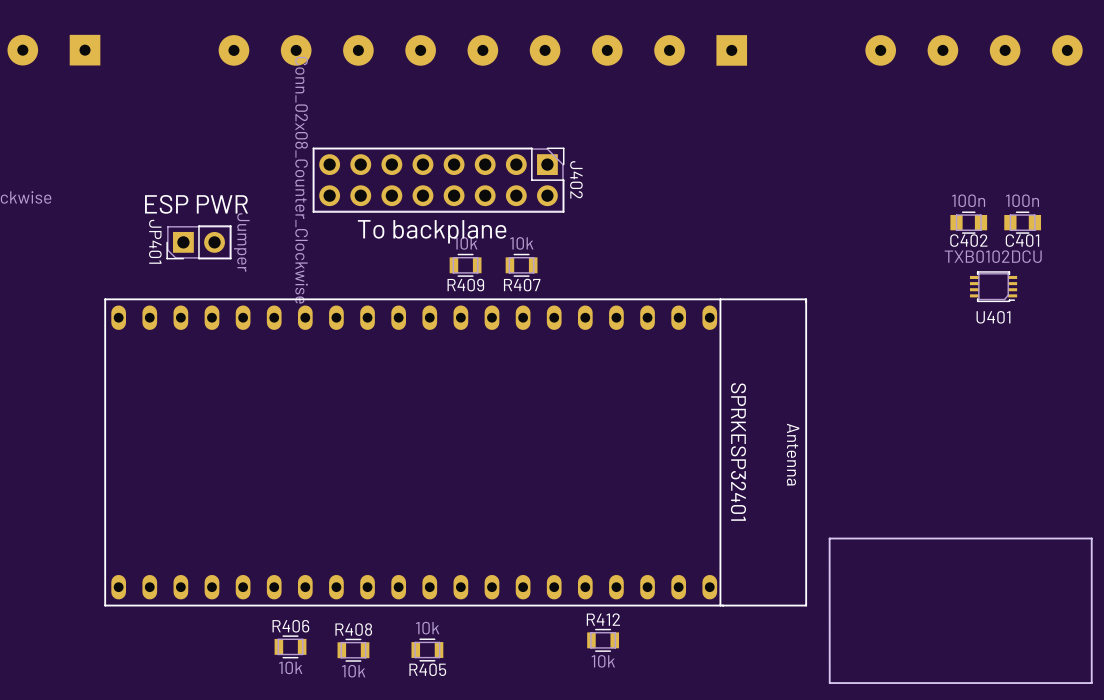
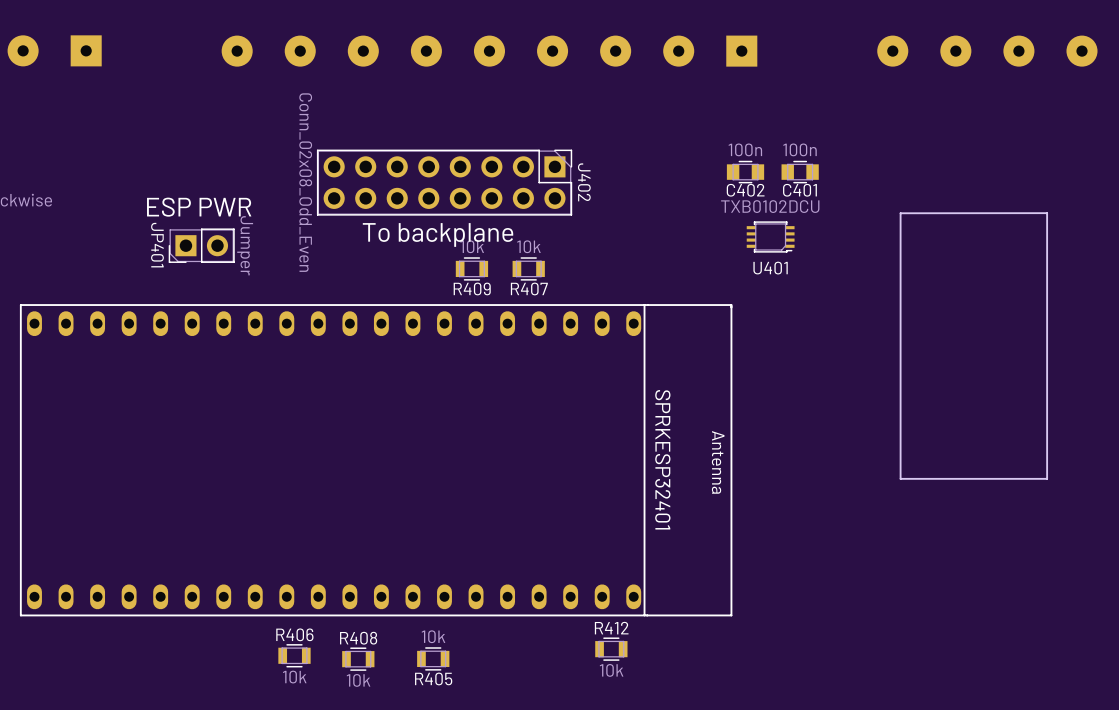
J402 value: Conn_02x08_Counter_Clockwise (301, 180) -> Conn_02x08_Odd_Even (305, 182)
board edge: none -> (1047, 213) (1047, 478) (900, 478) (900, 213) (1047, 213)
C402 position: (968, 222) -> (745, 172)
C401 position: (1022, 222) -> (800, 172)
U401 position: (993, 286) -> (770, 236)
SPRKESP32401 position: (455, 452) -> (376, 460)
board edge: (1091, 538) (829, 538) (829, 683) (1091, 683) (1091, 538) -> none

